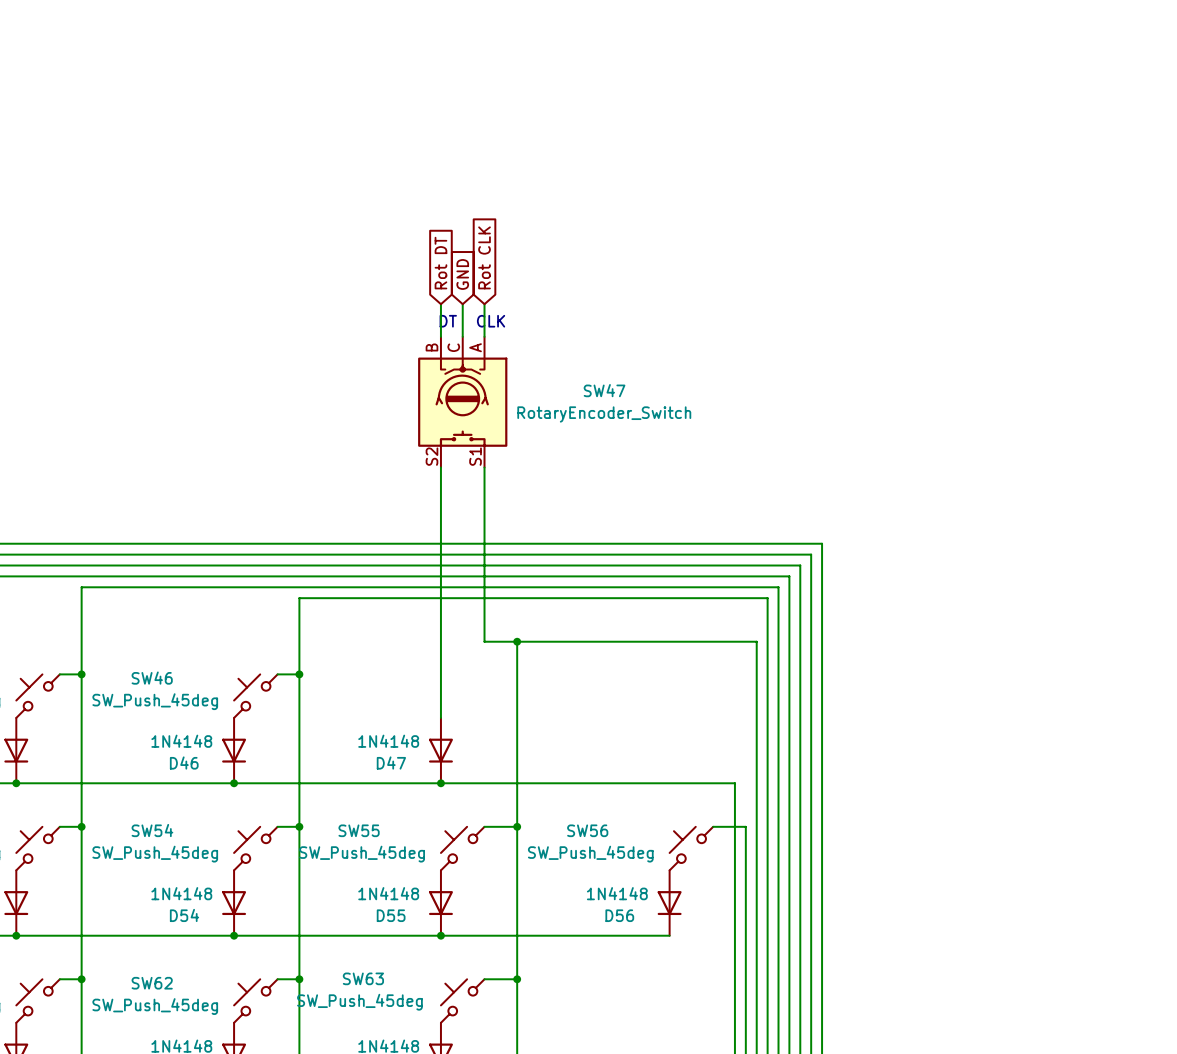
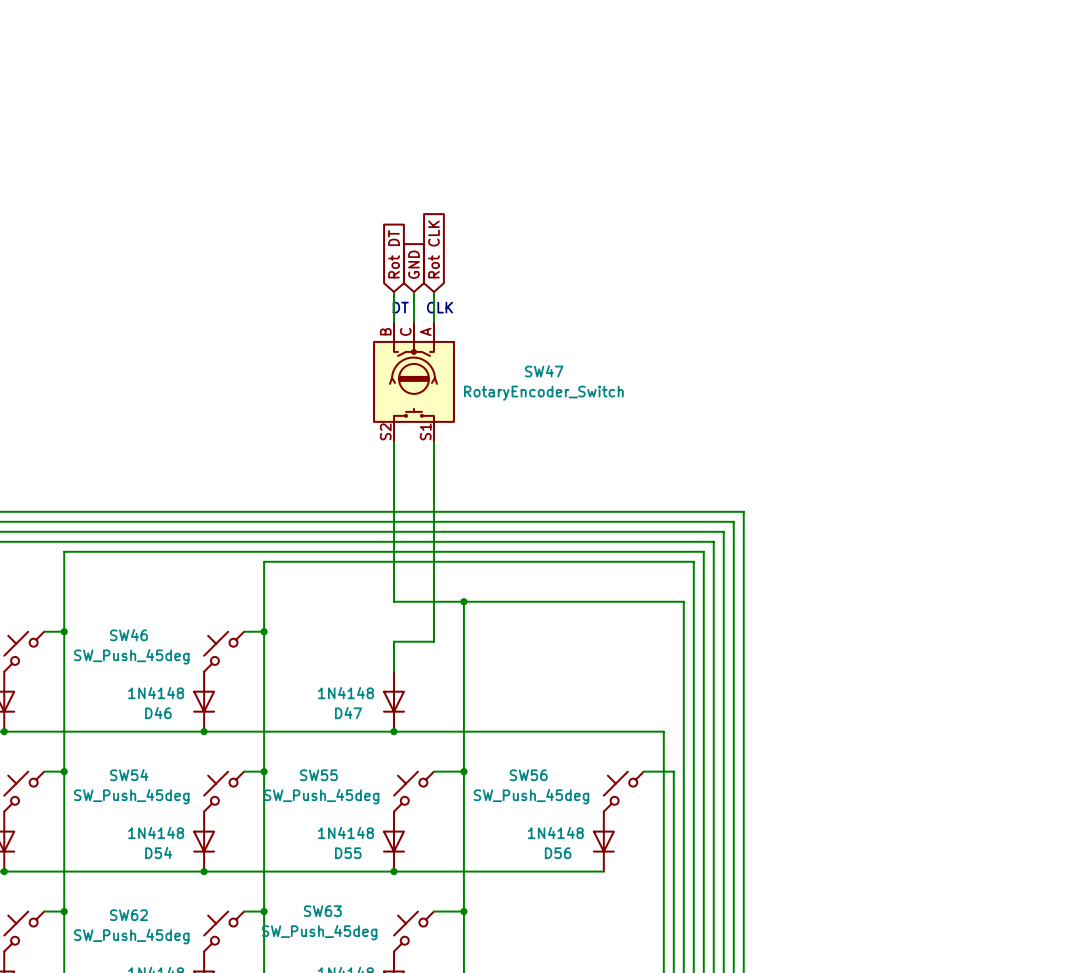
wire: (440, 641) (440, 685) -> (393, 601) (433, 601) (433, 641) (393, 641)

